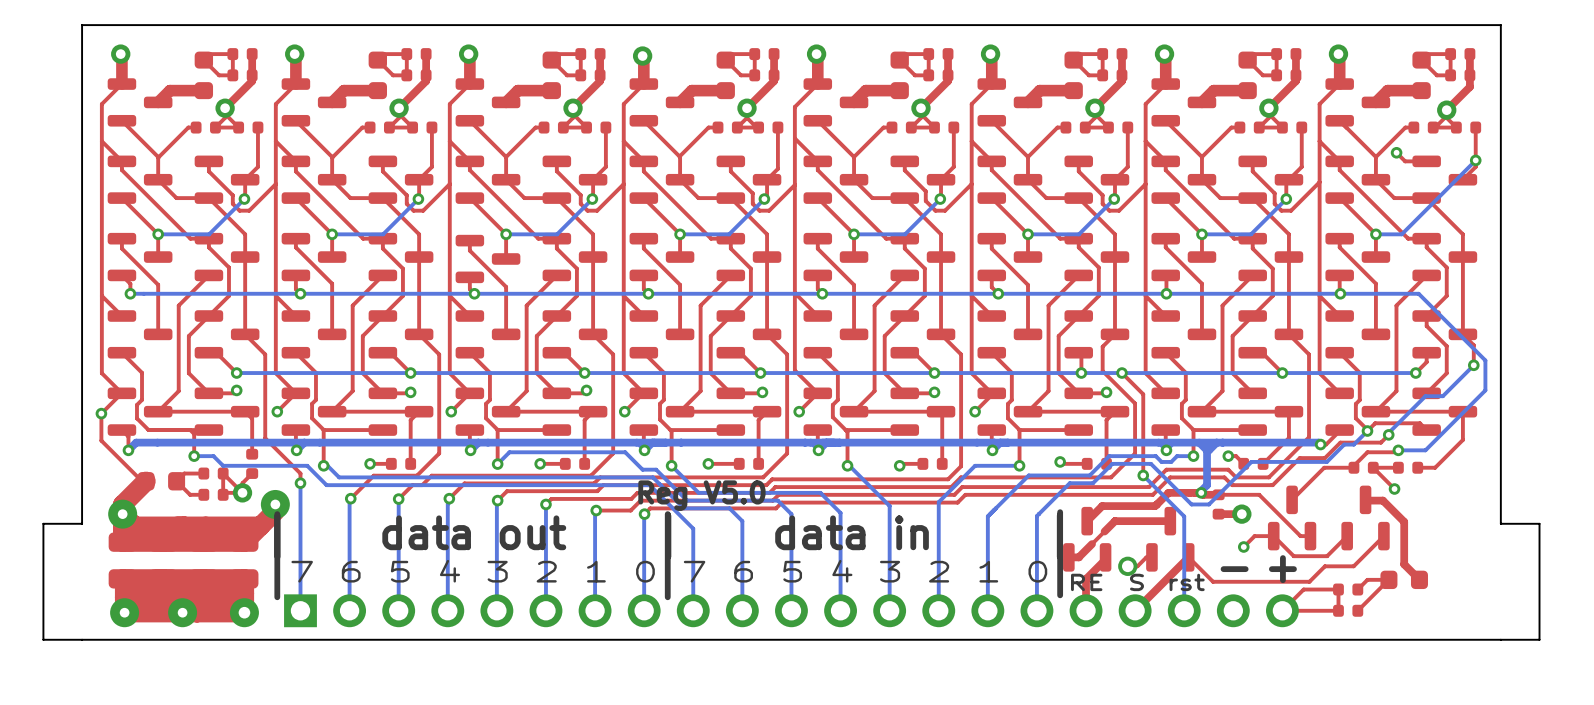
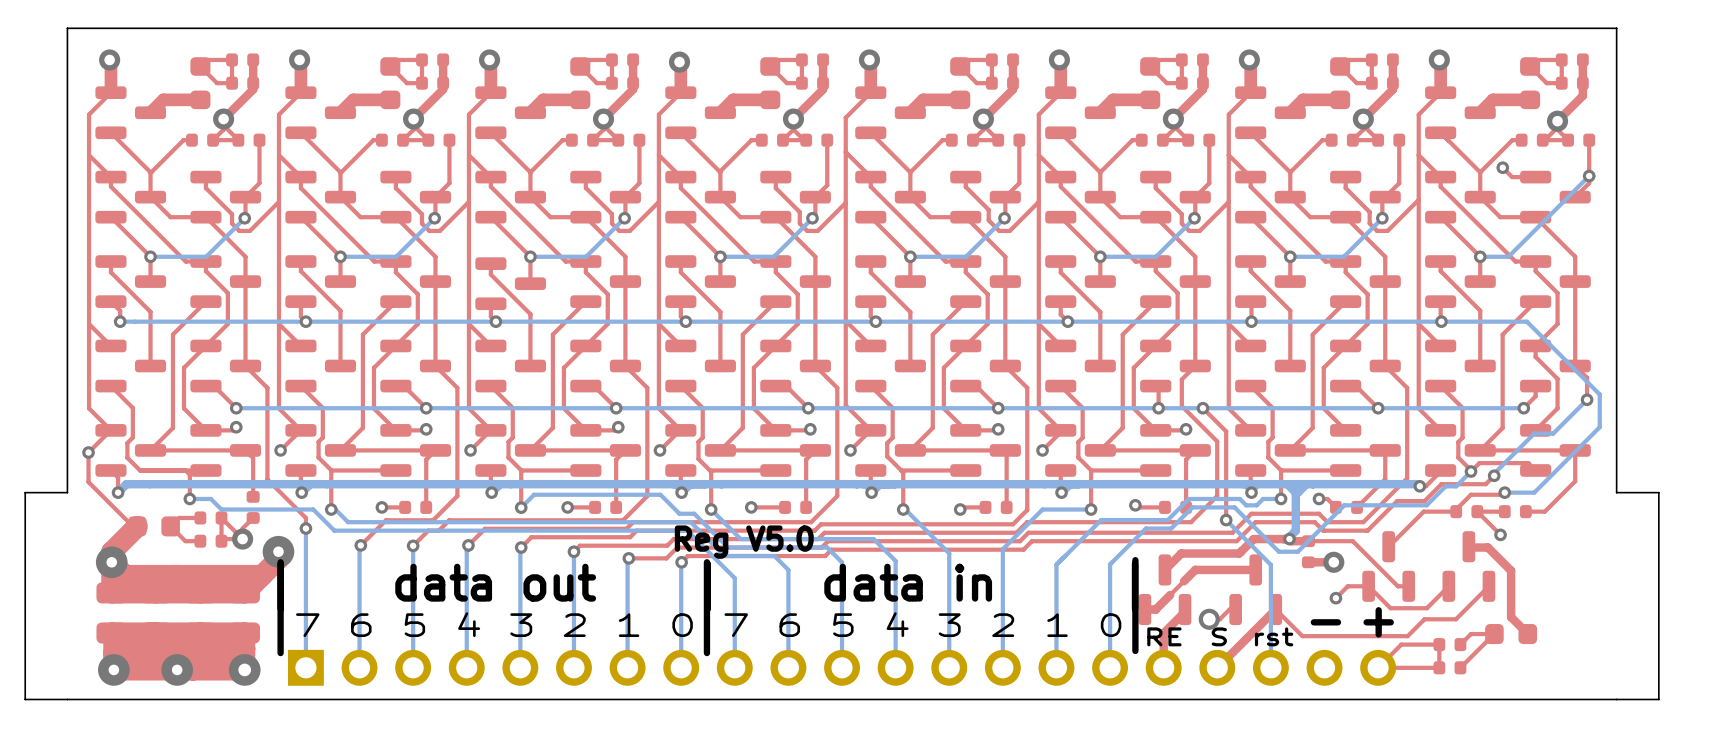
board edge: (82, 450) (82, 523) (43, 523) -> (67, 492) (25, 492) (25, 572)
board edge: (1500, 450) (1500, 523) (1539, 523) -> (1616, 492) (1658, 492) (1658, 572)

